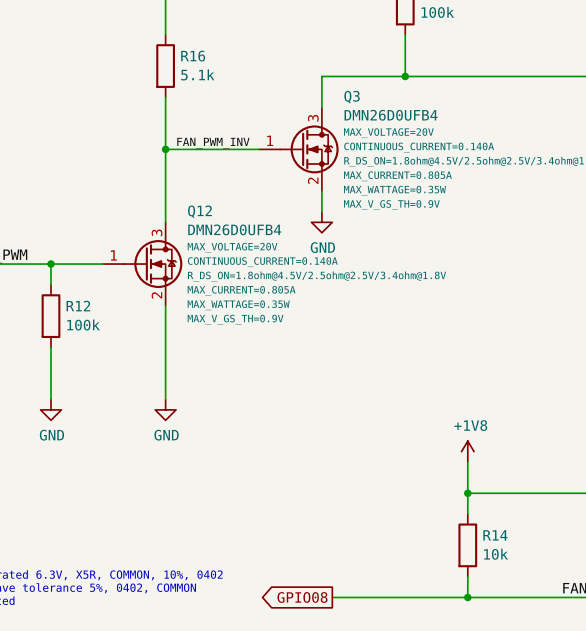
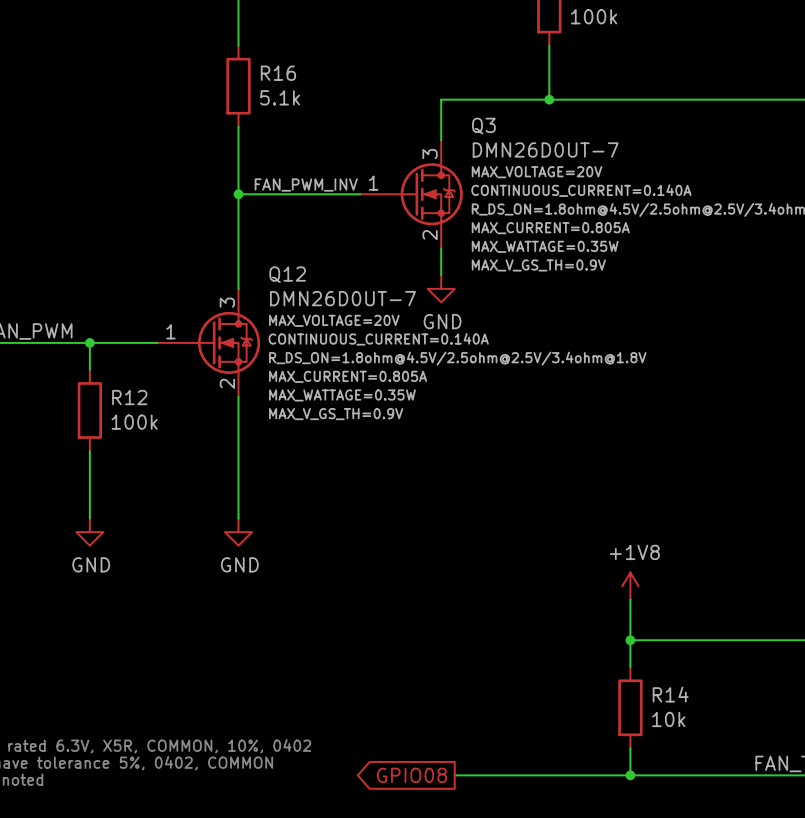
Q3 value: DMN26D0UFB4 (391, 115) -> DMN26D0UT-7 (545, 149)
Q12 value: DMN26D0UFB4 (234, 229) -> DMN26D0UT-7 (342, 298)

